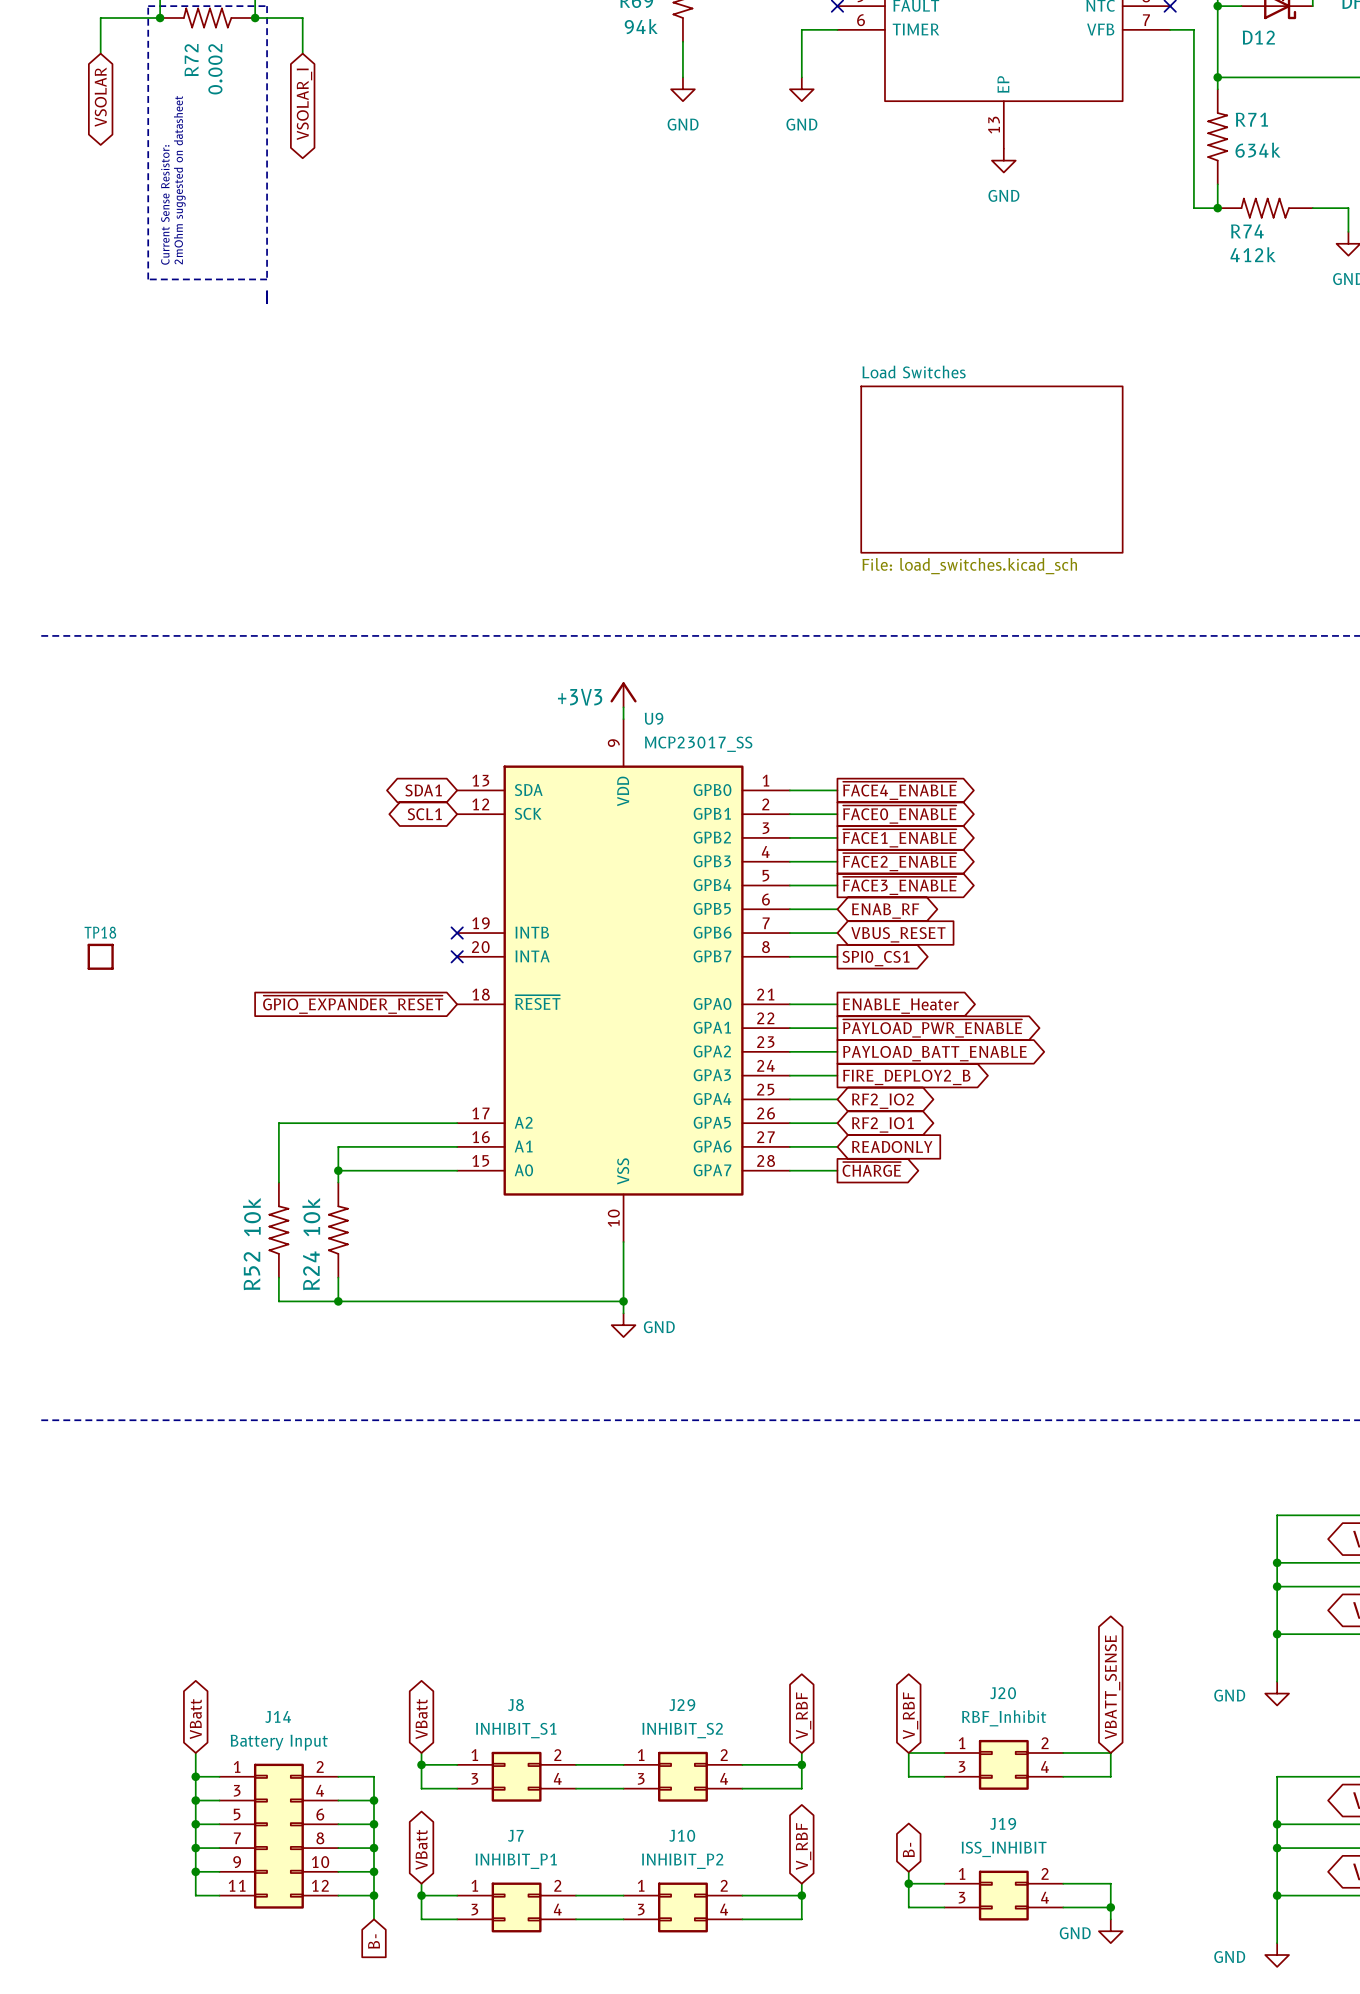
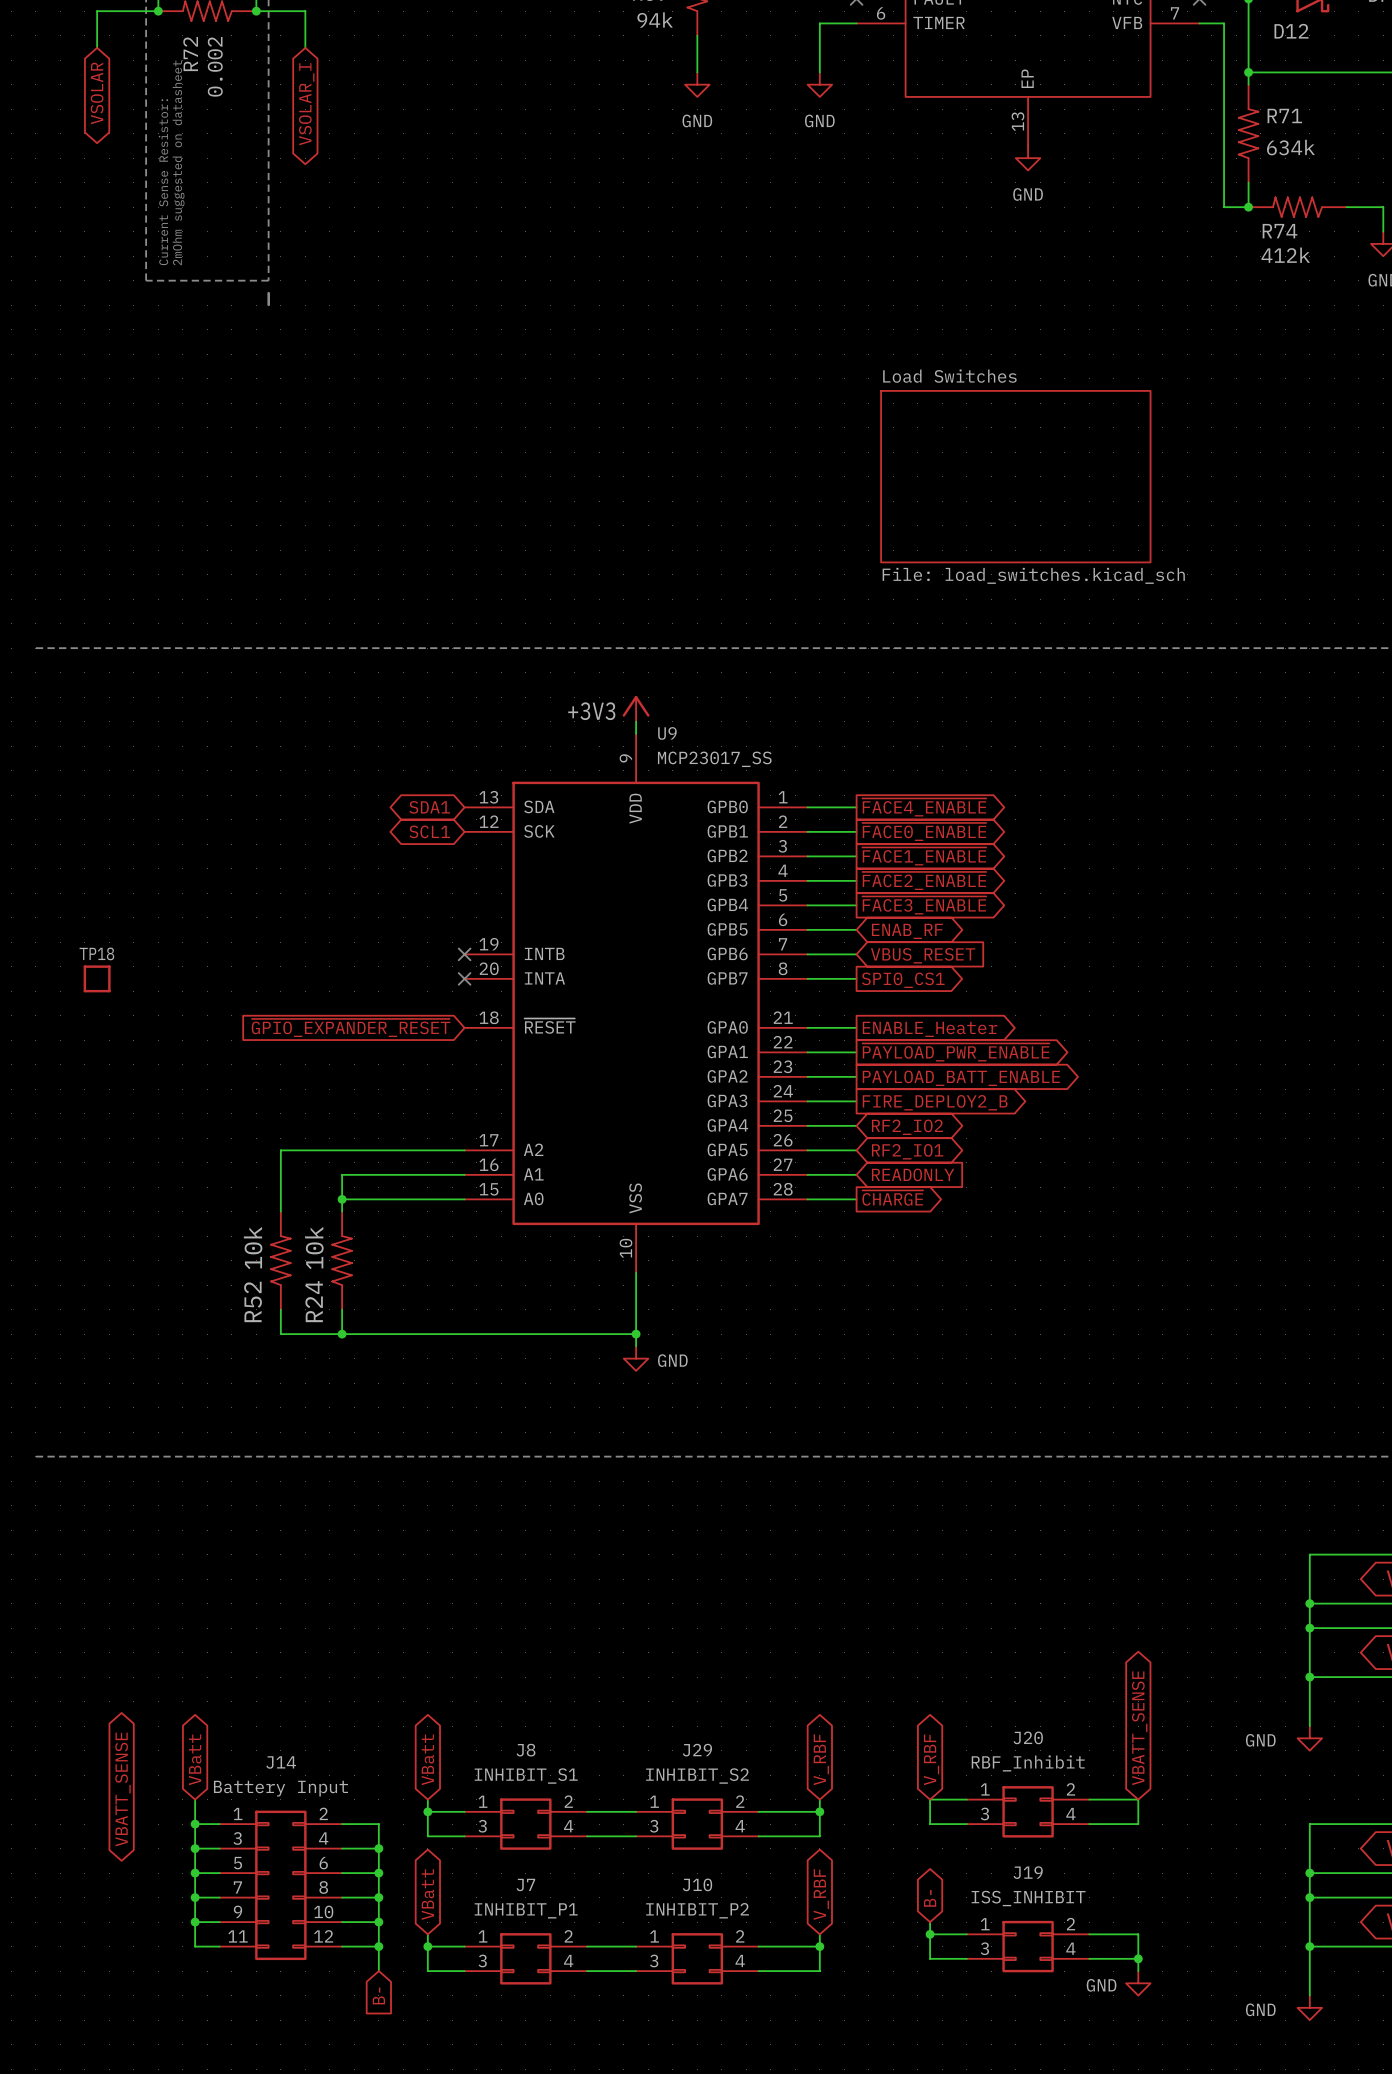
global label: none -> VBATT_SENSE (122, 1789)

